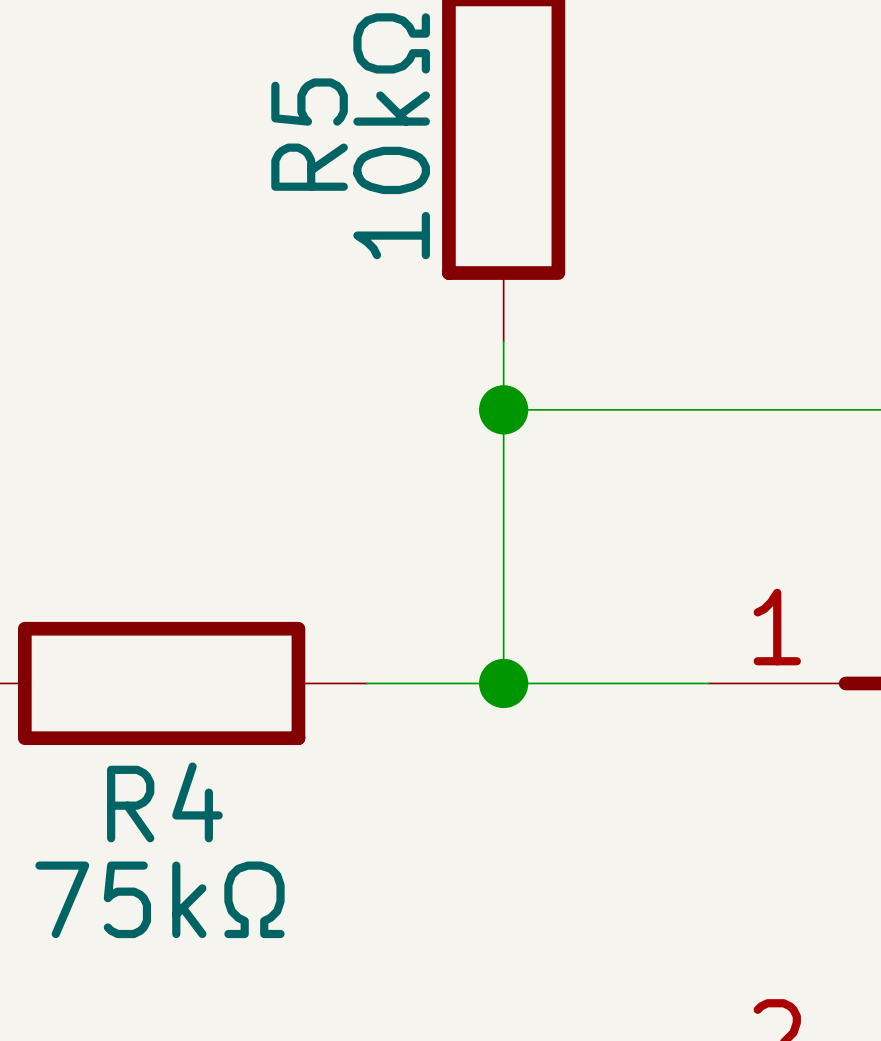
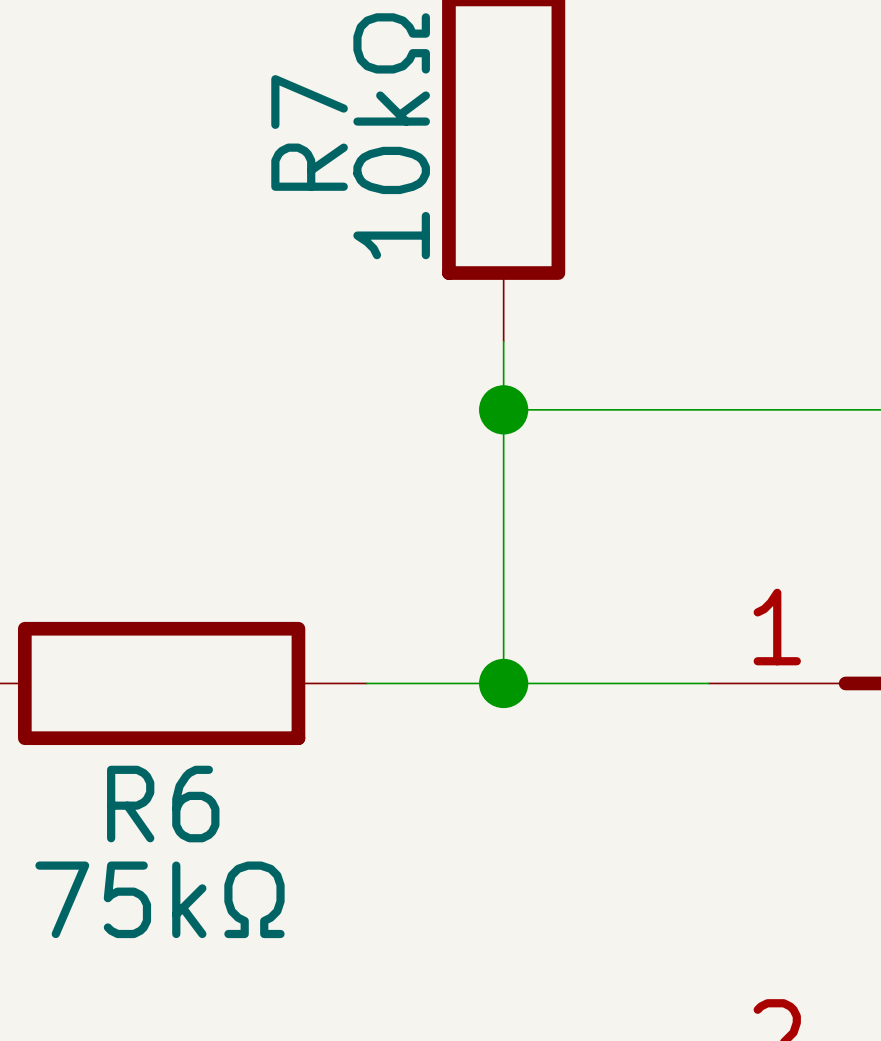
R5 name: R5 (309, 134) -> R7 (309, 132)
R4 name: R4 (164, 802) -> R6 (163, 804)

